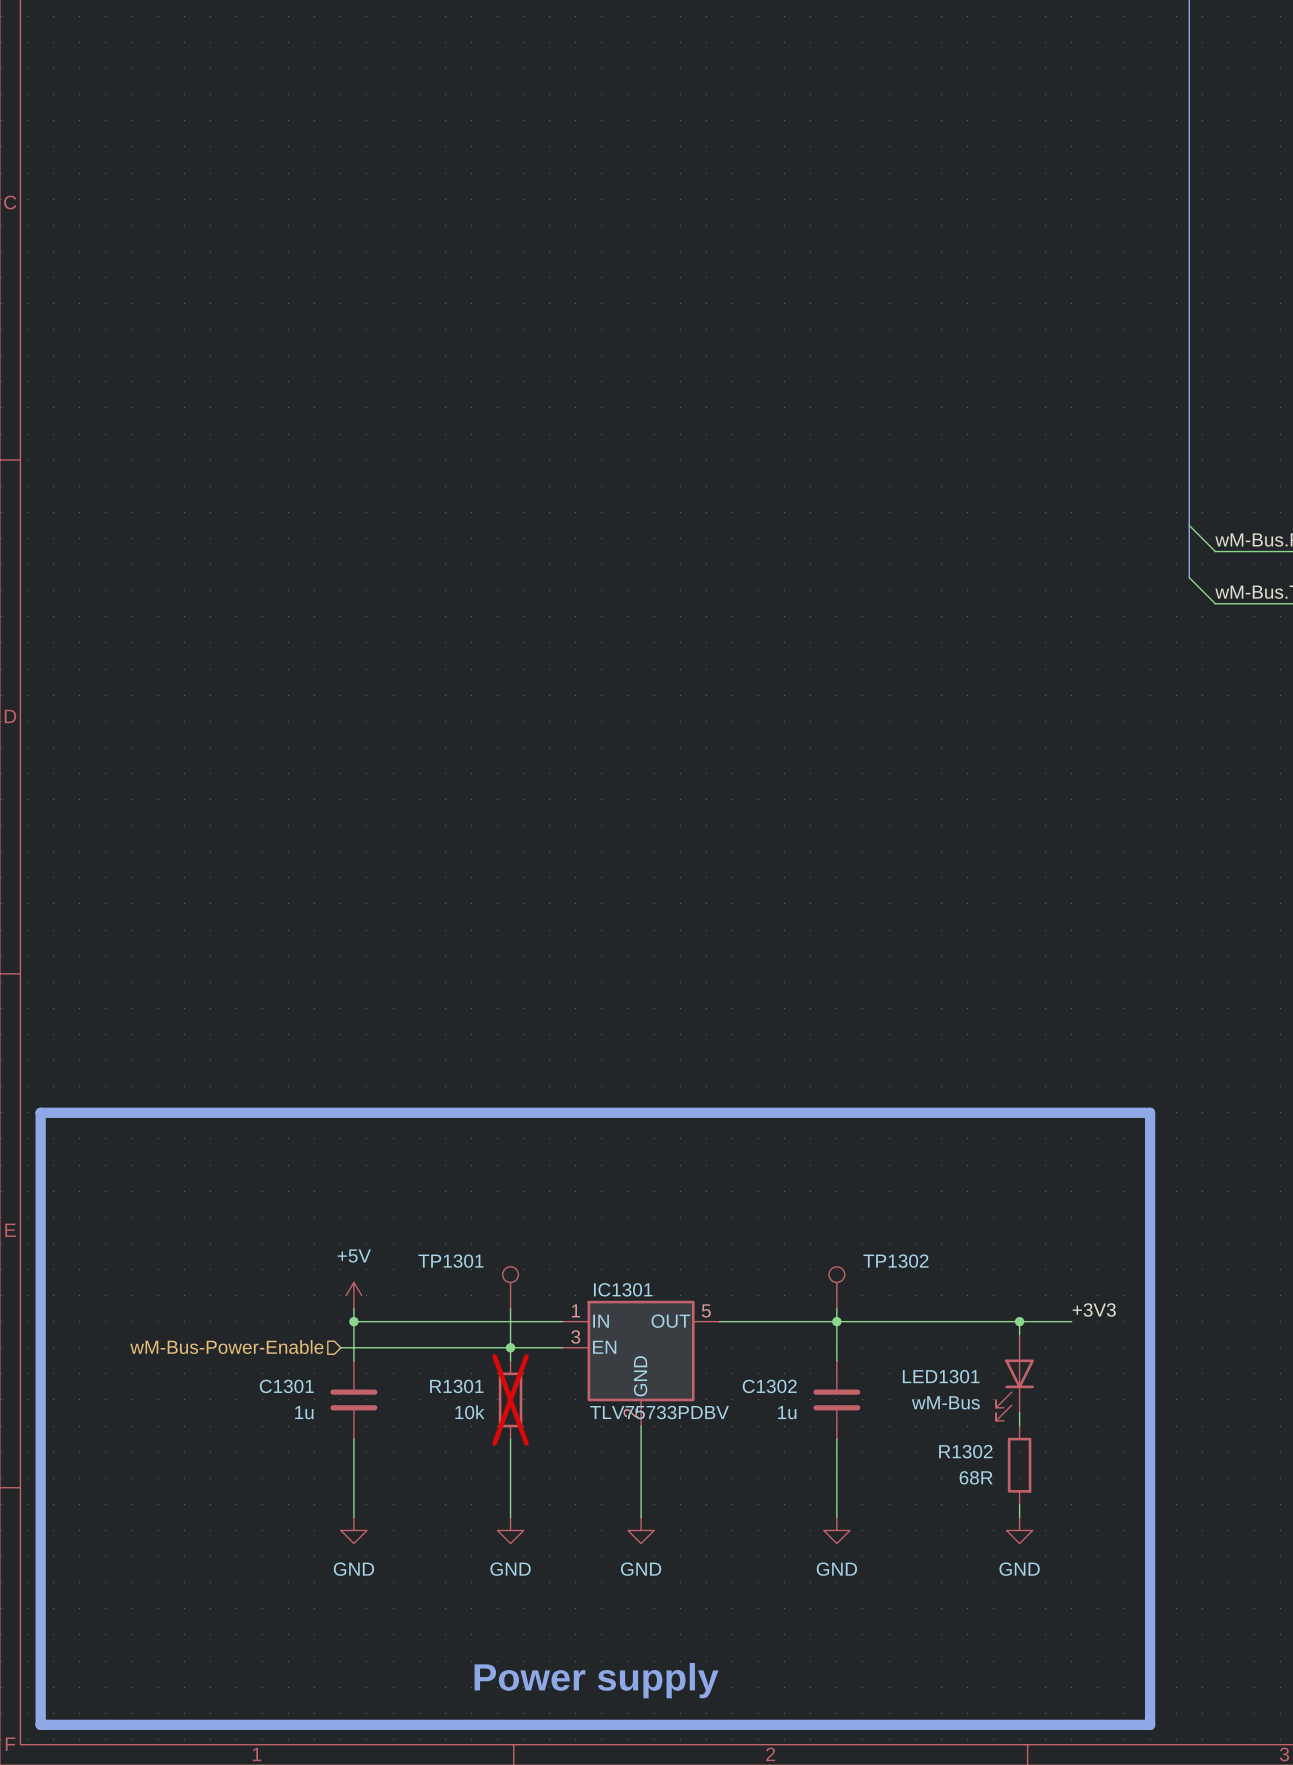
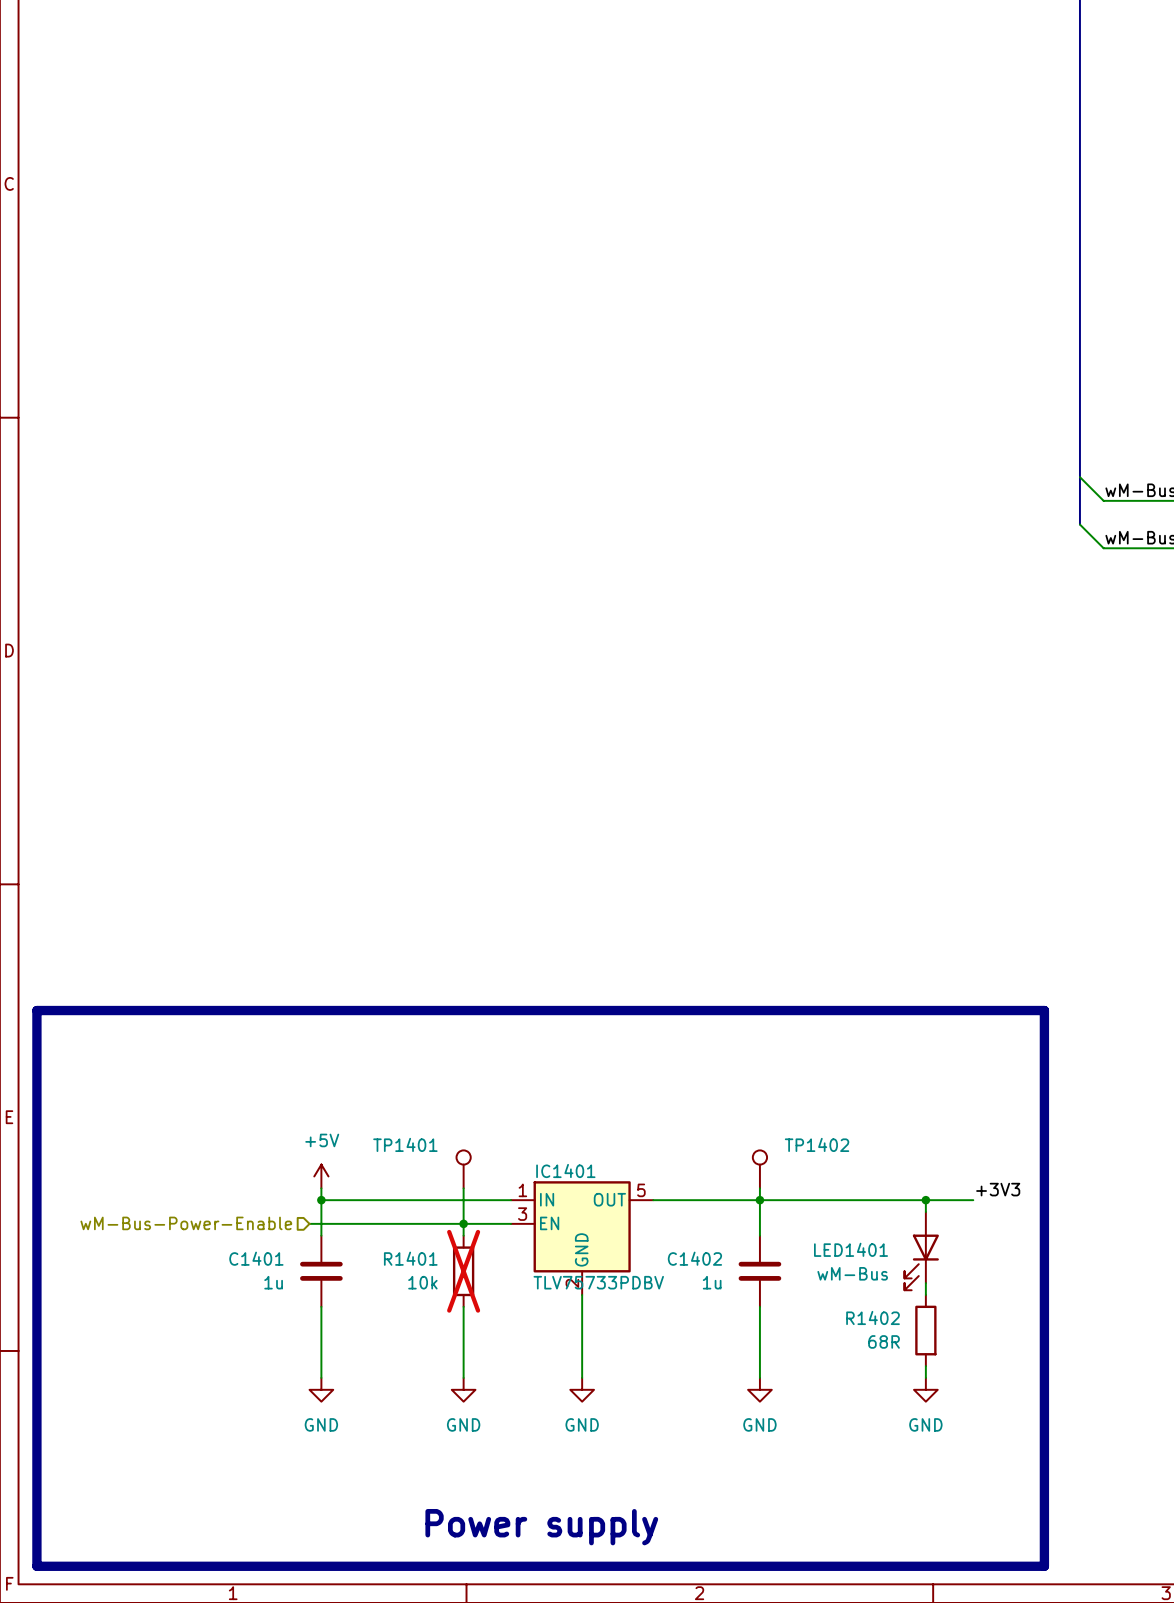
TP1301 name: TP1301 (450, 1261) -> TP1401 (405, 1144)
TP1302 name: TP1302 (895, 1261) -> TP1402 (817, 1144)
IC1301 name: IC1301 (623, 1289) -> IC1401 (565, 1171)
LED1301 name: LED1301 (941, 1376) -> LED1401 (851, 1249)
C1301 name: C1301 (286, 1386) -> C1401 (256, 1258)
R1301 name: R1301 (456, 1386) -> R1401 (410, 1258)
C1302 name: C1302 (769, 1386) -> C1402 (694, 1258)
R1302 name: R1302 (965, 1451) -> R1402 (873, 1317)

